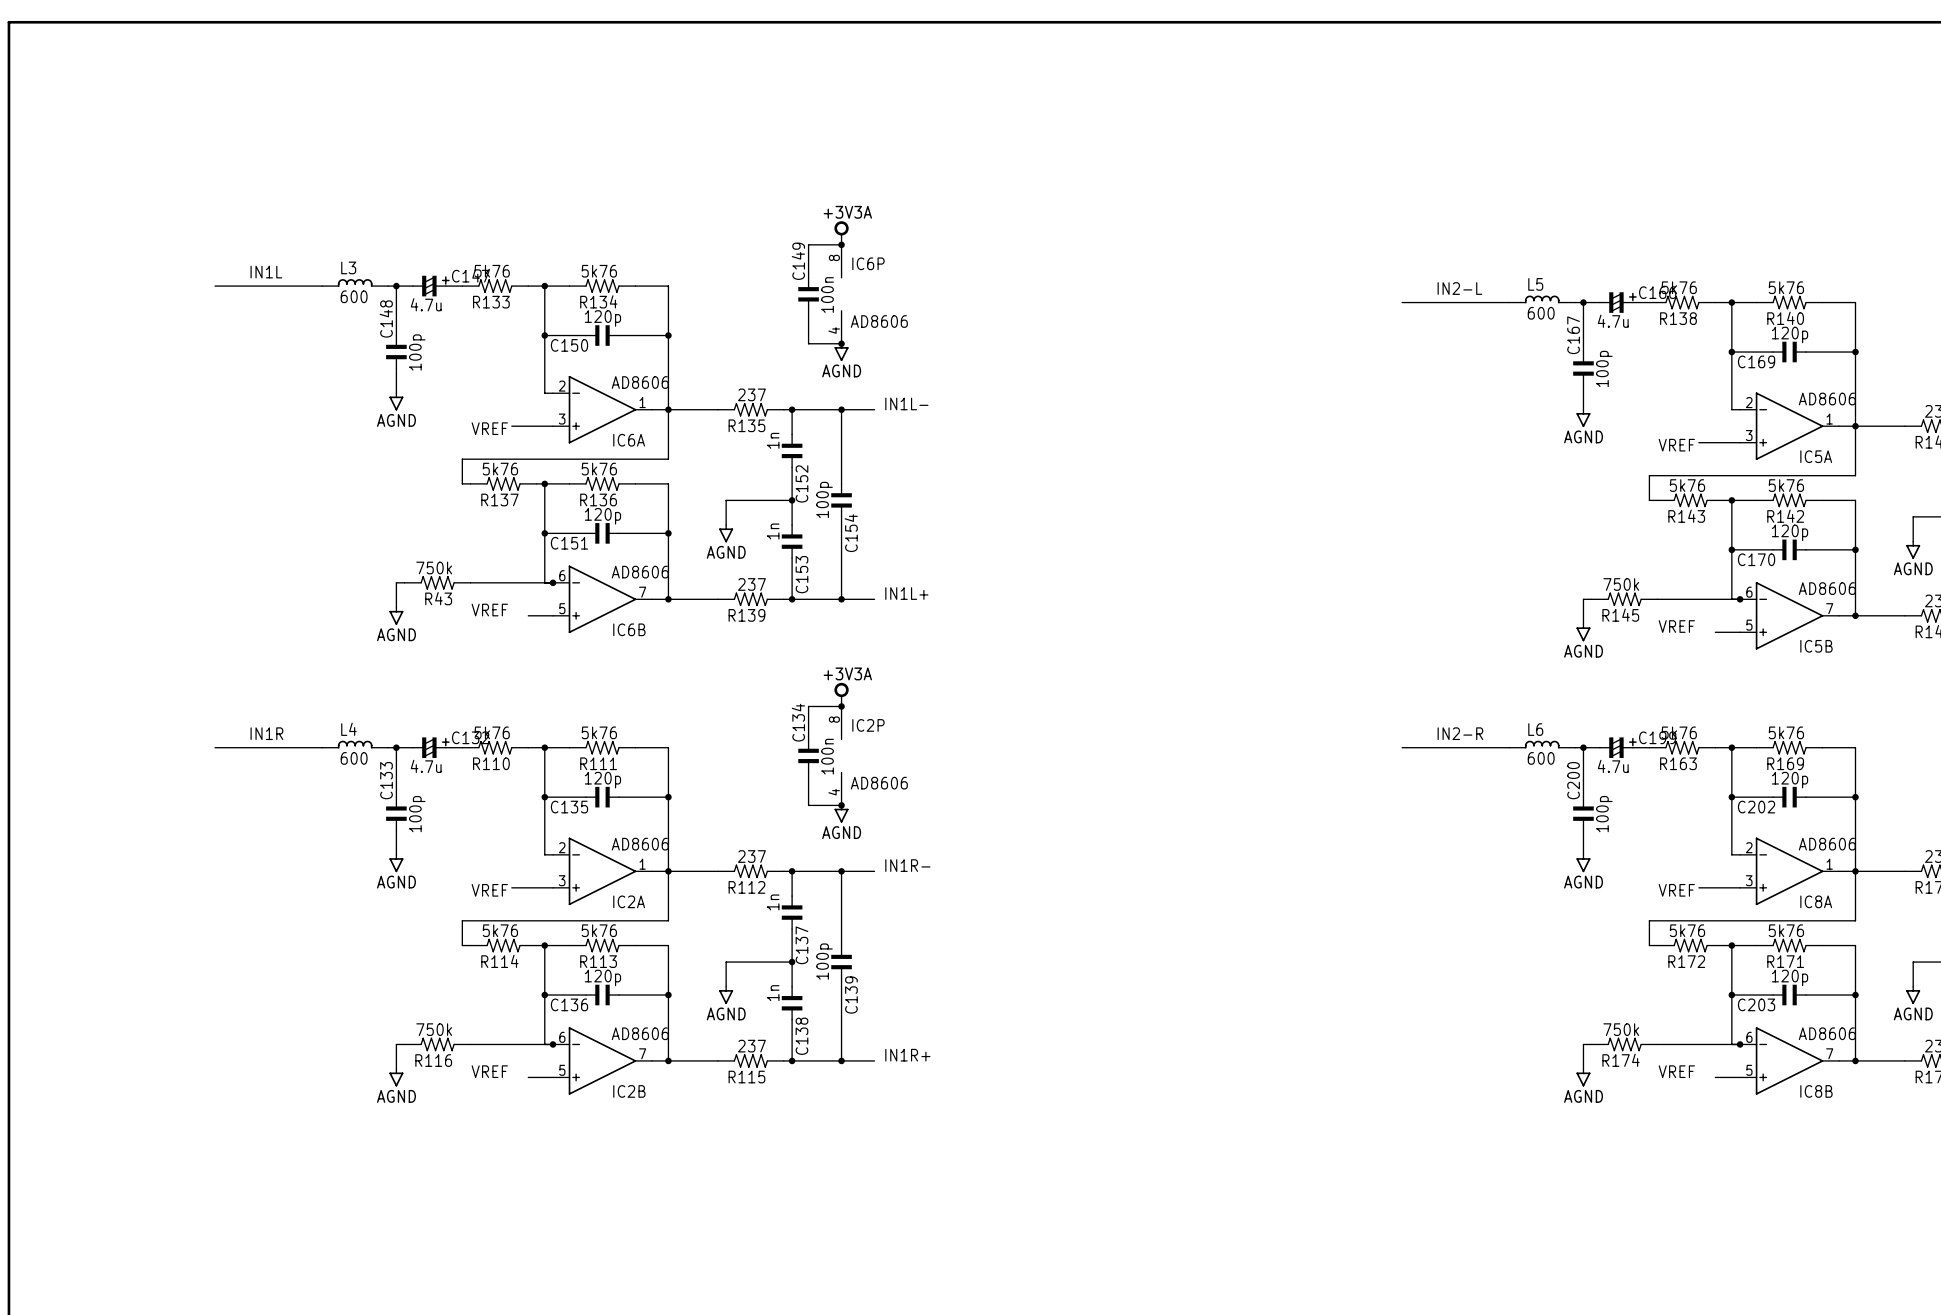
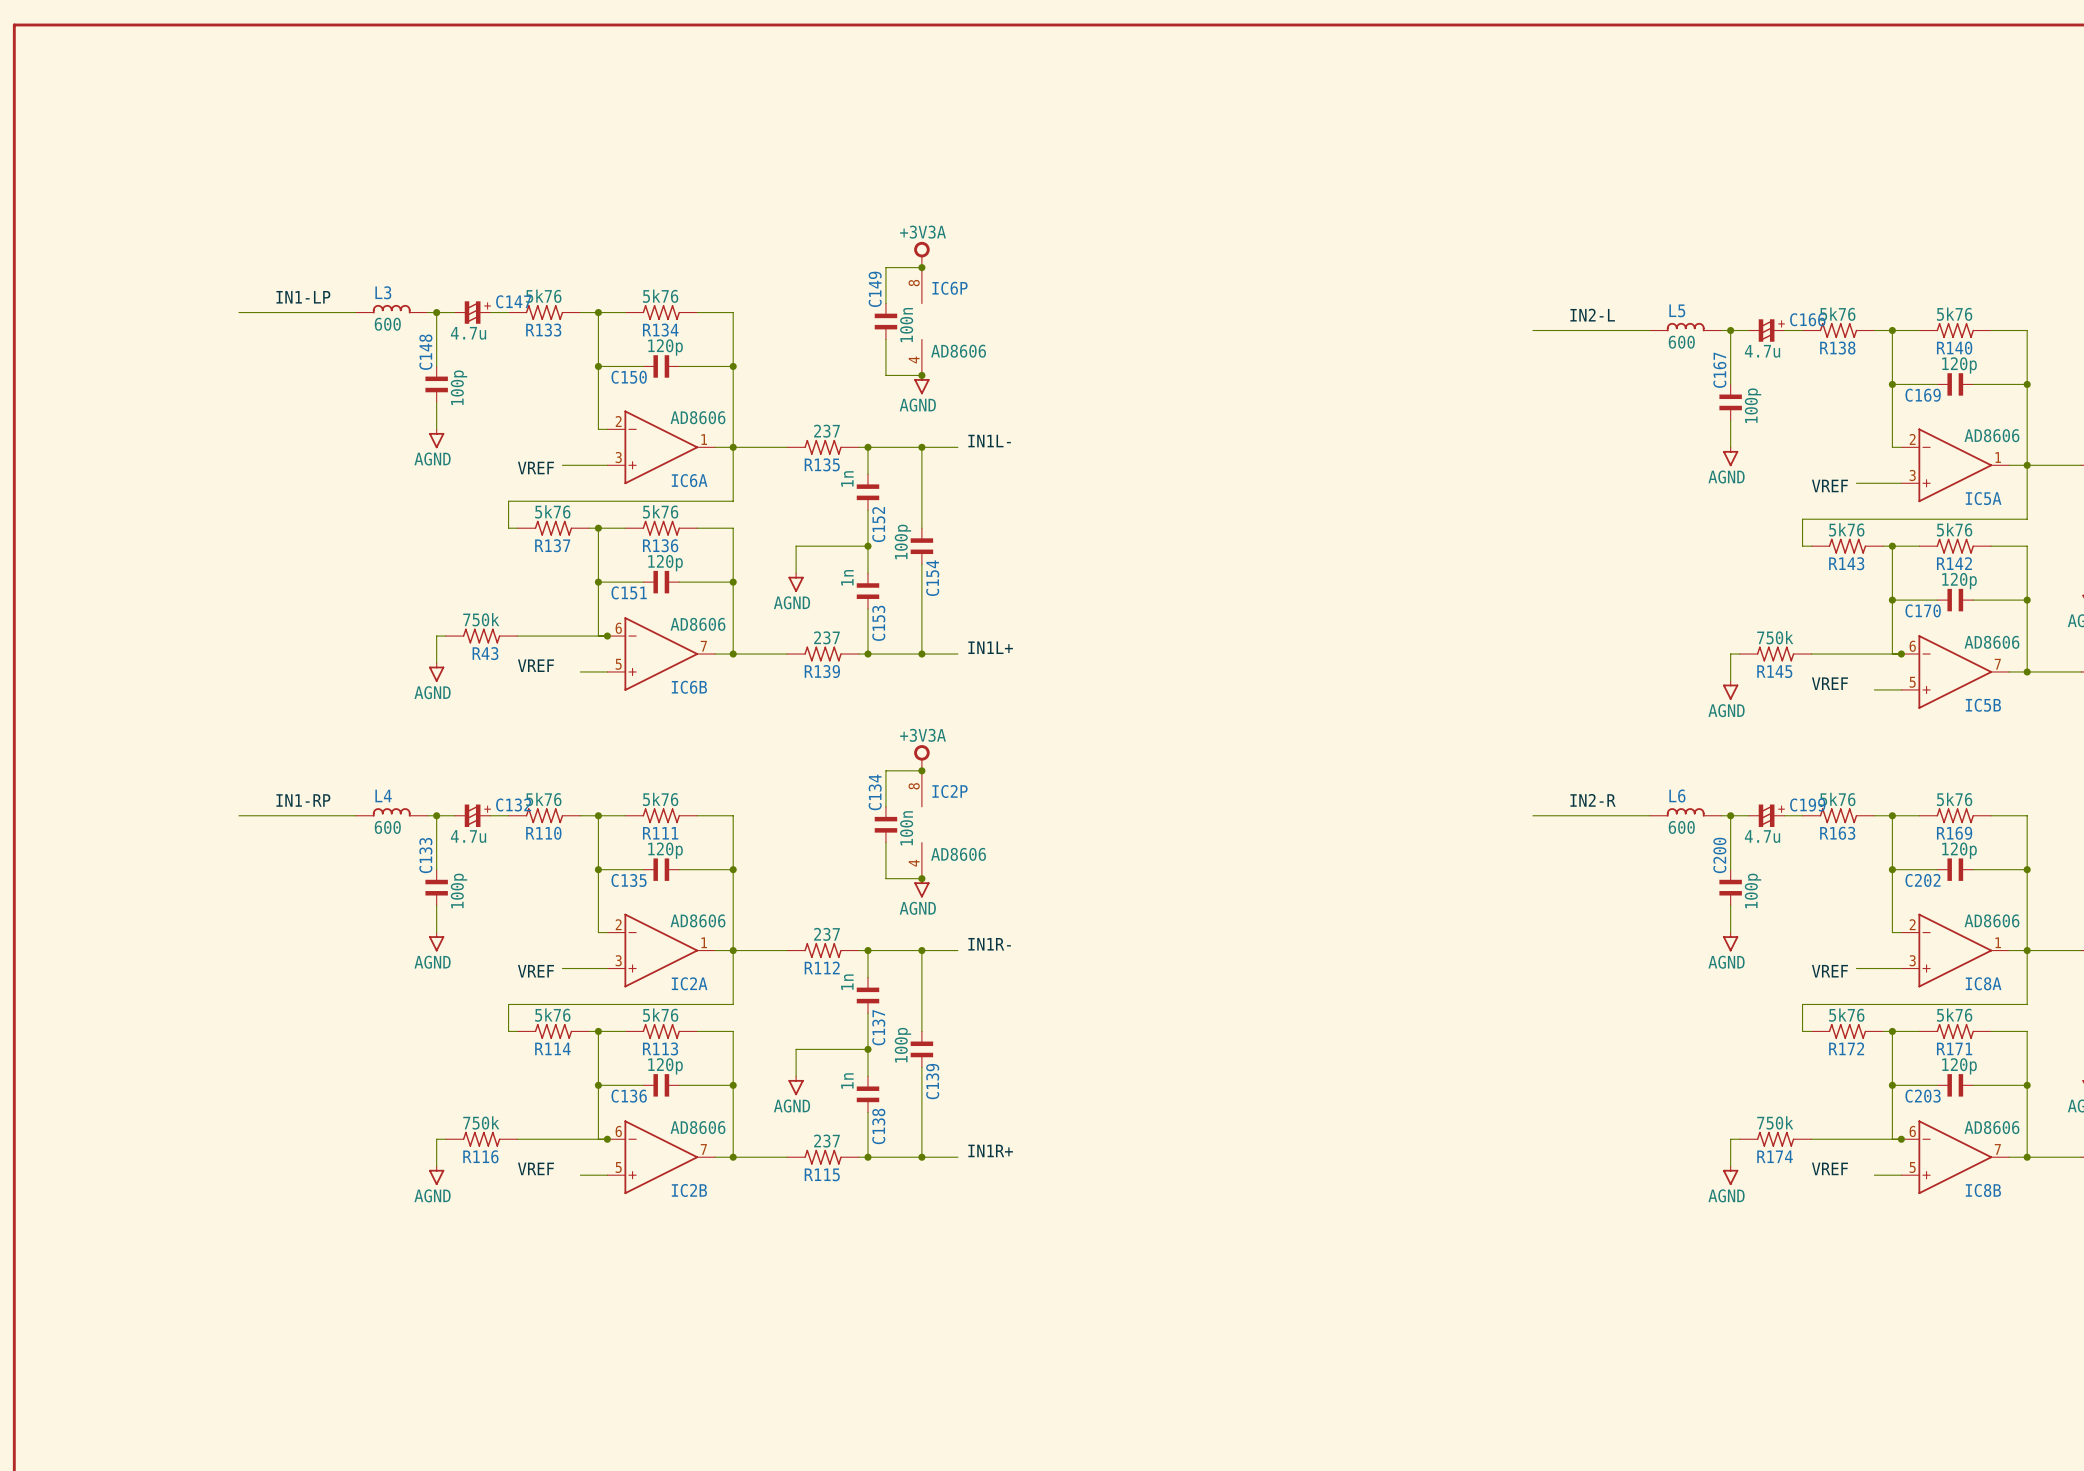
label: IN1L (266, 272) -> IN1-LP (303, 297)
label: IN1R (266, 733) -> IN1-RP (303, 800)

